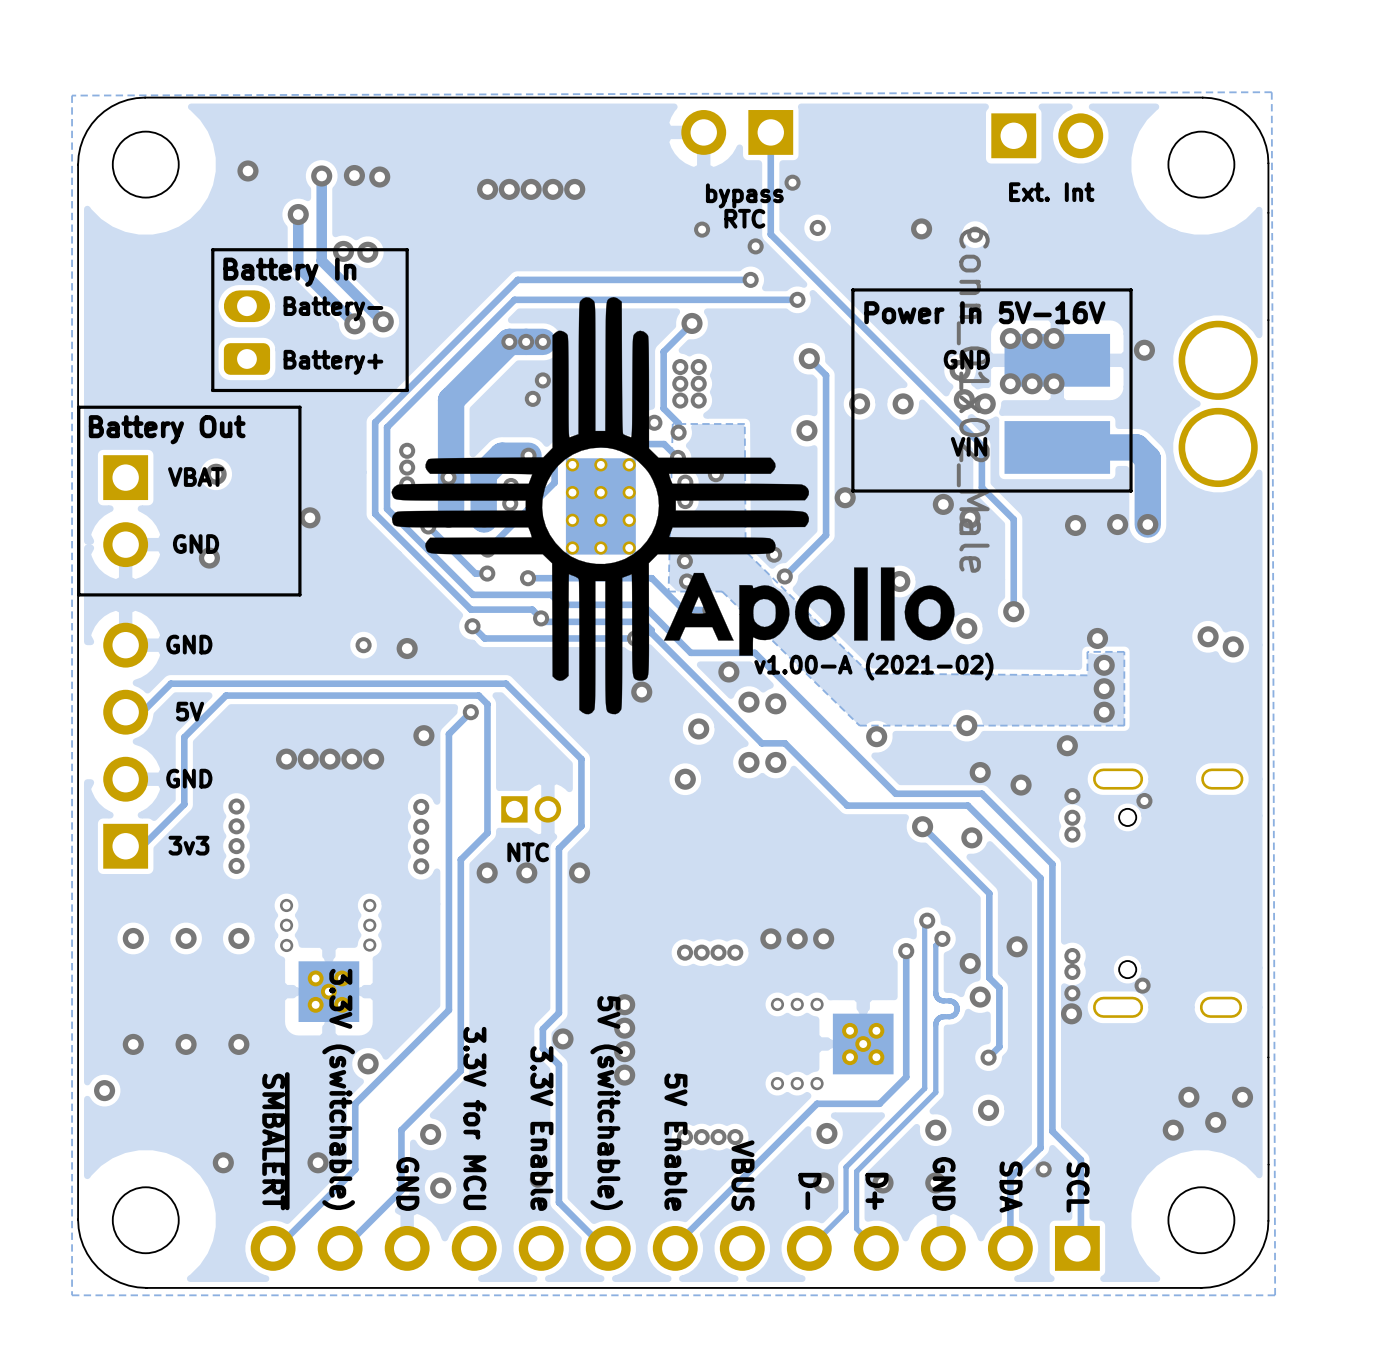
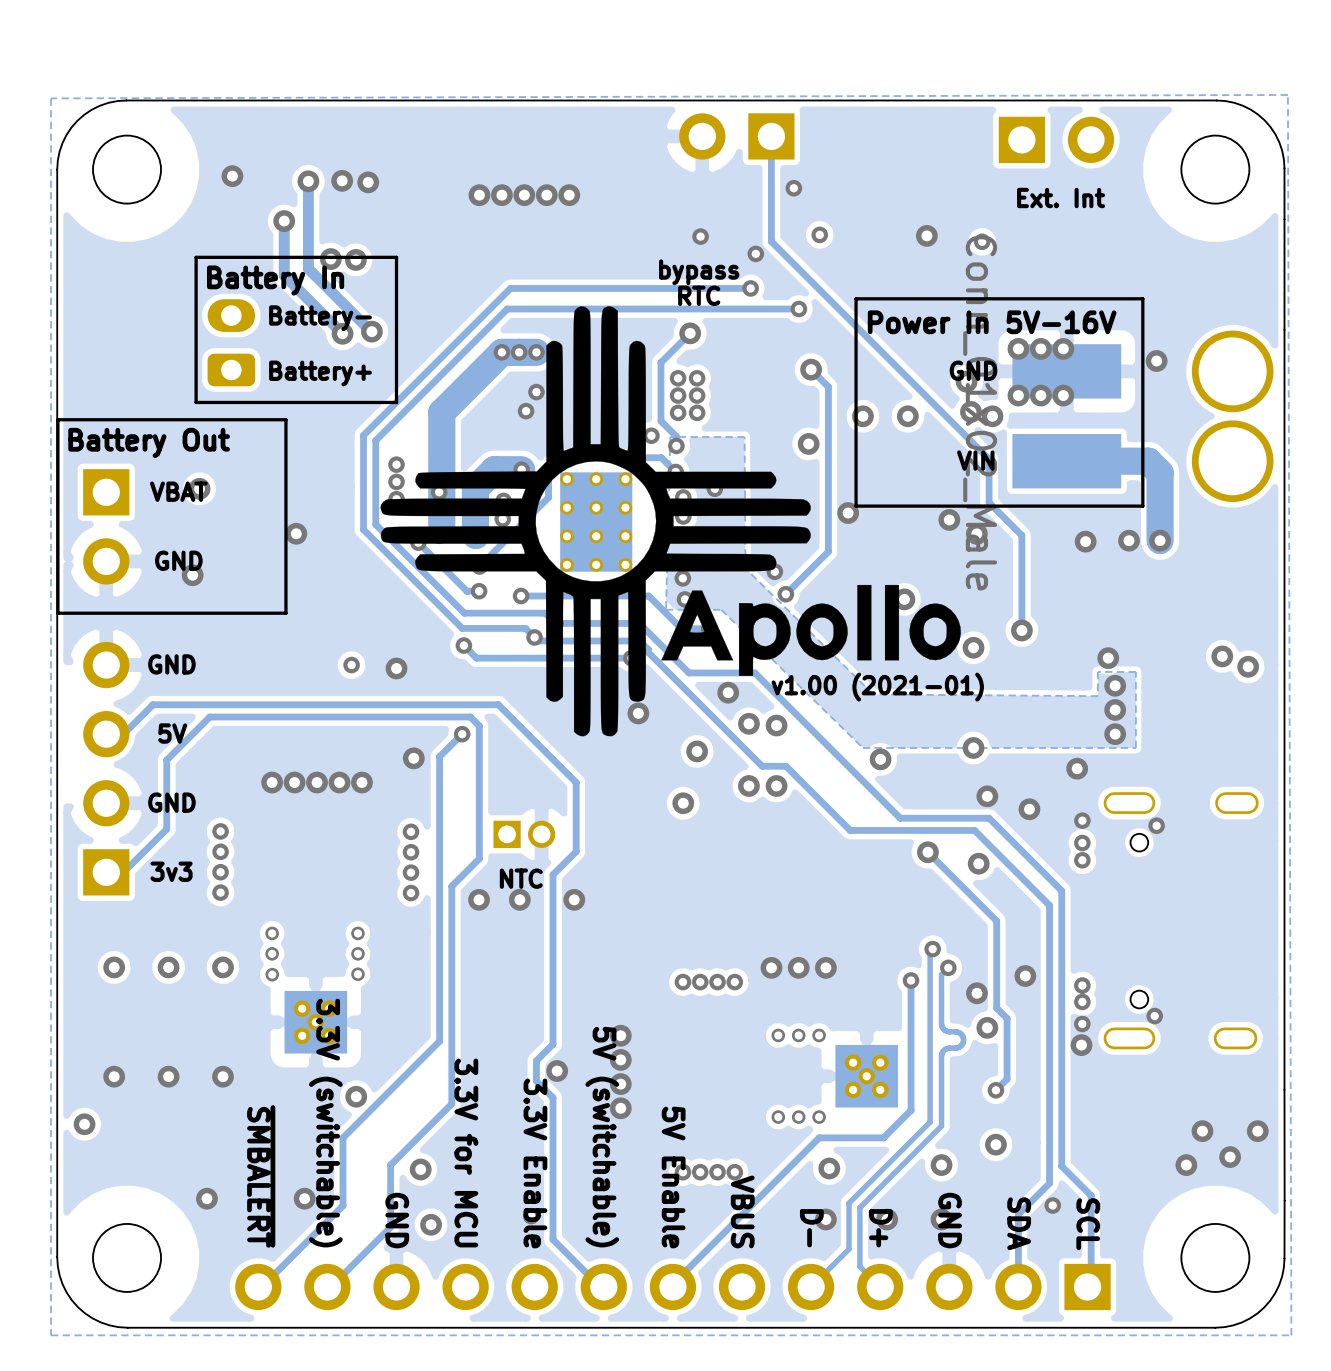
text position: bypass (744, 195) -> bypass (699, 272)
text position: RTC (744, 218) -> RTC (699, 295)
text: v1.00-A (2021-02) (873, 666) -> v1.00 (2021-01) (877, 687)

